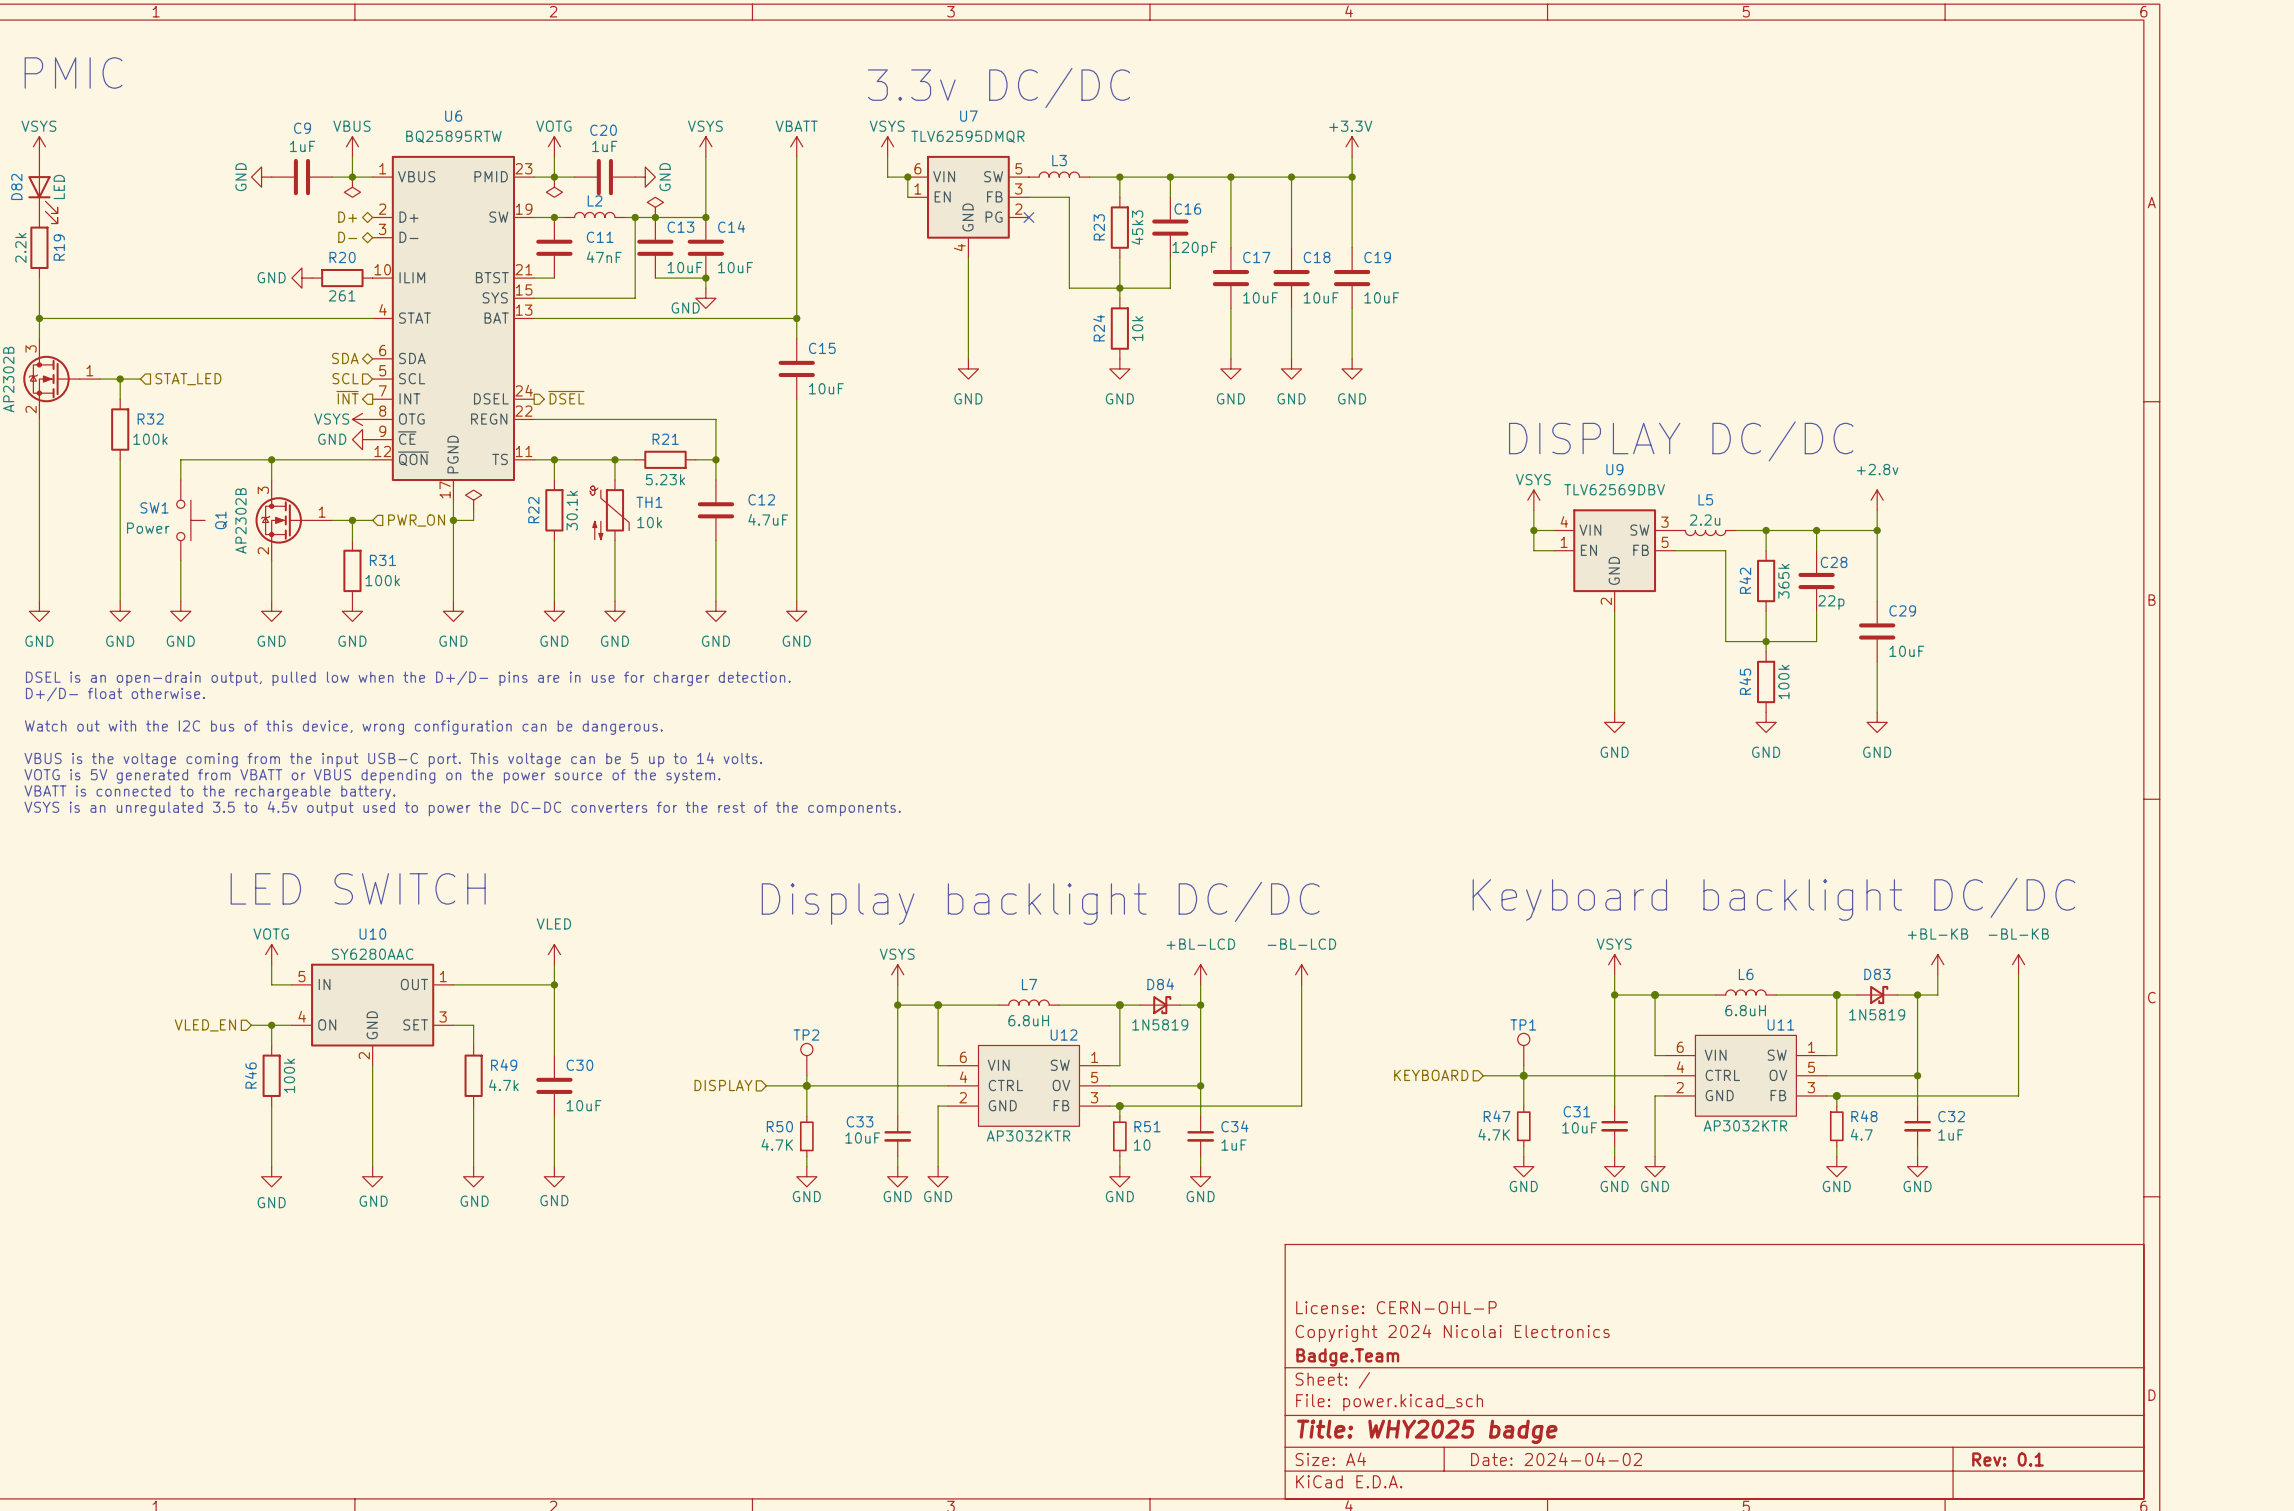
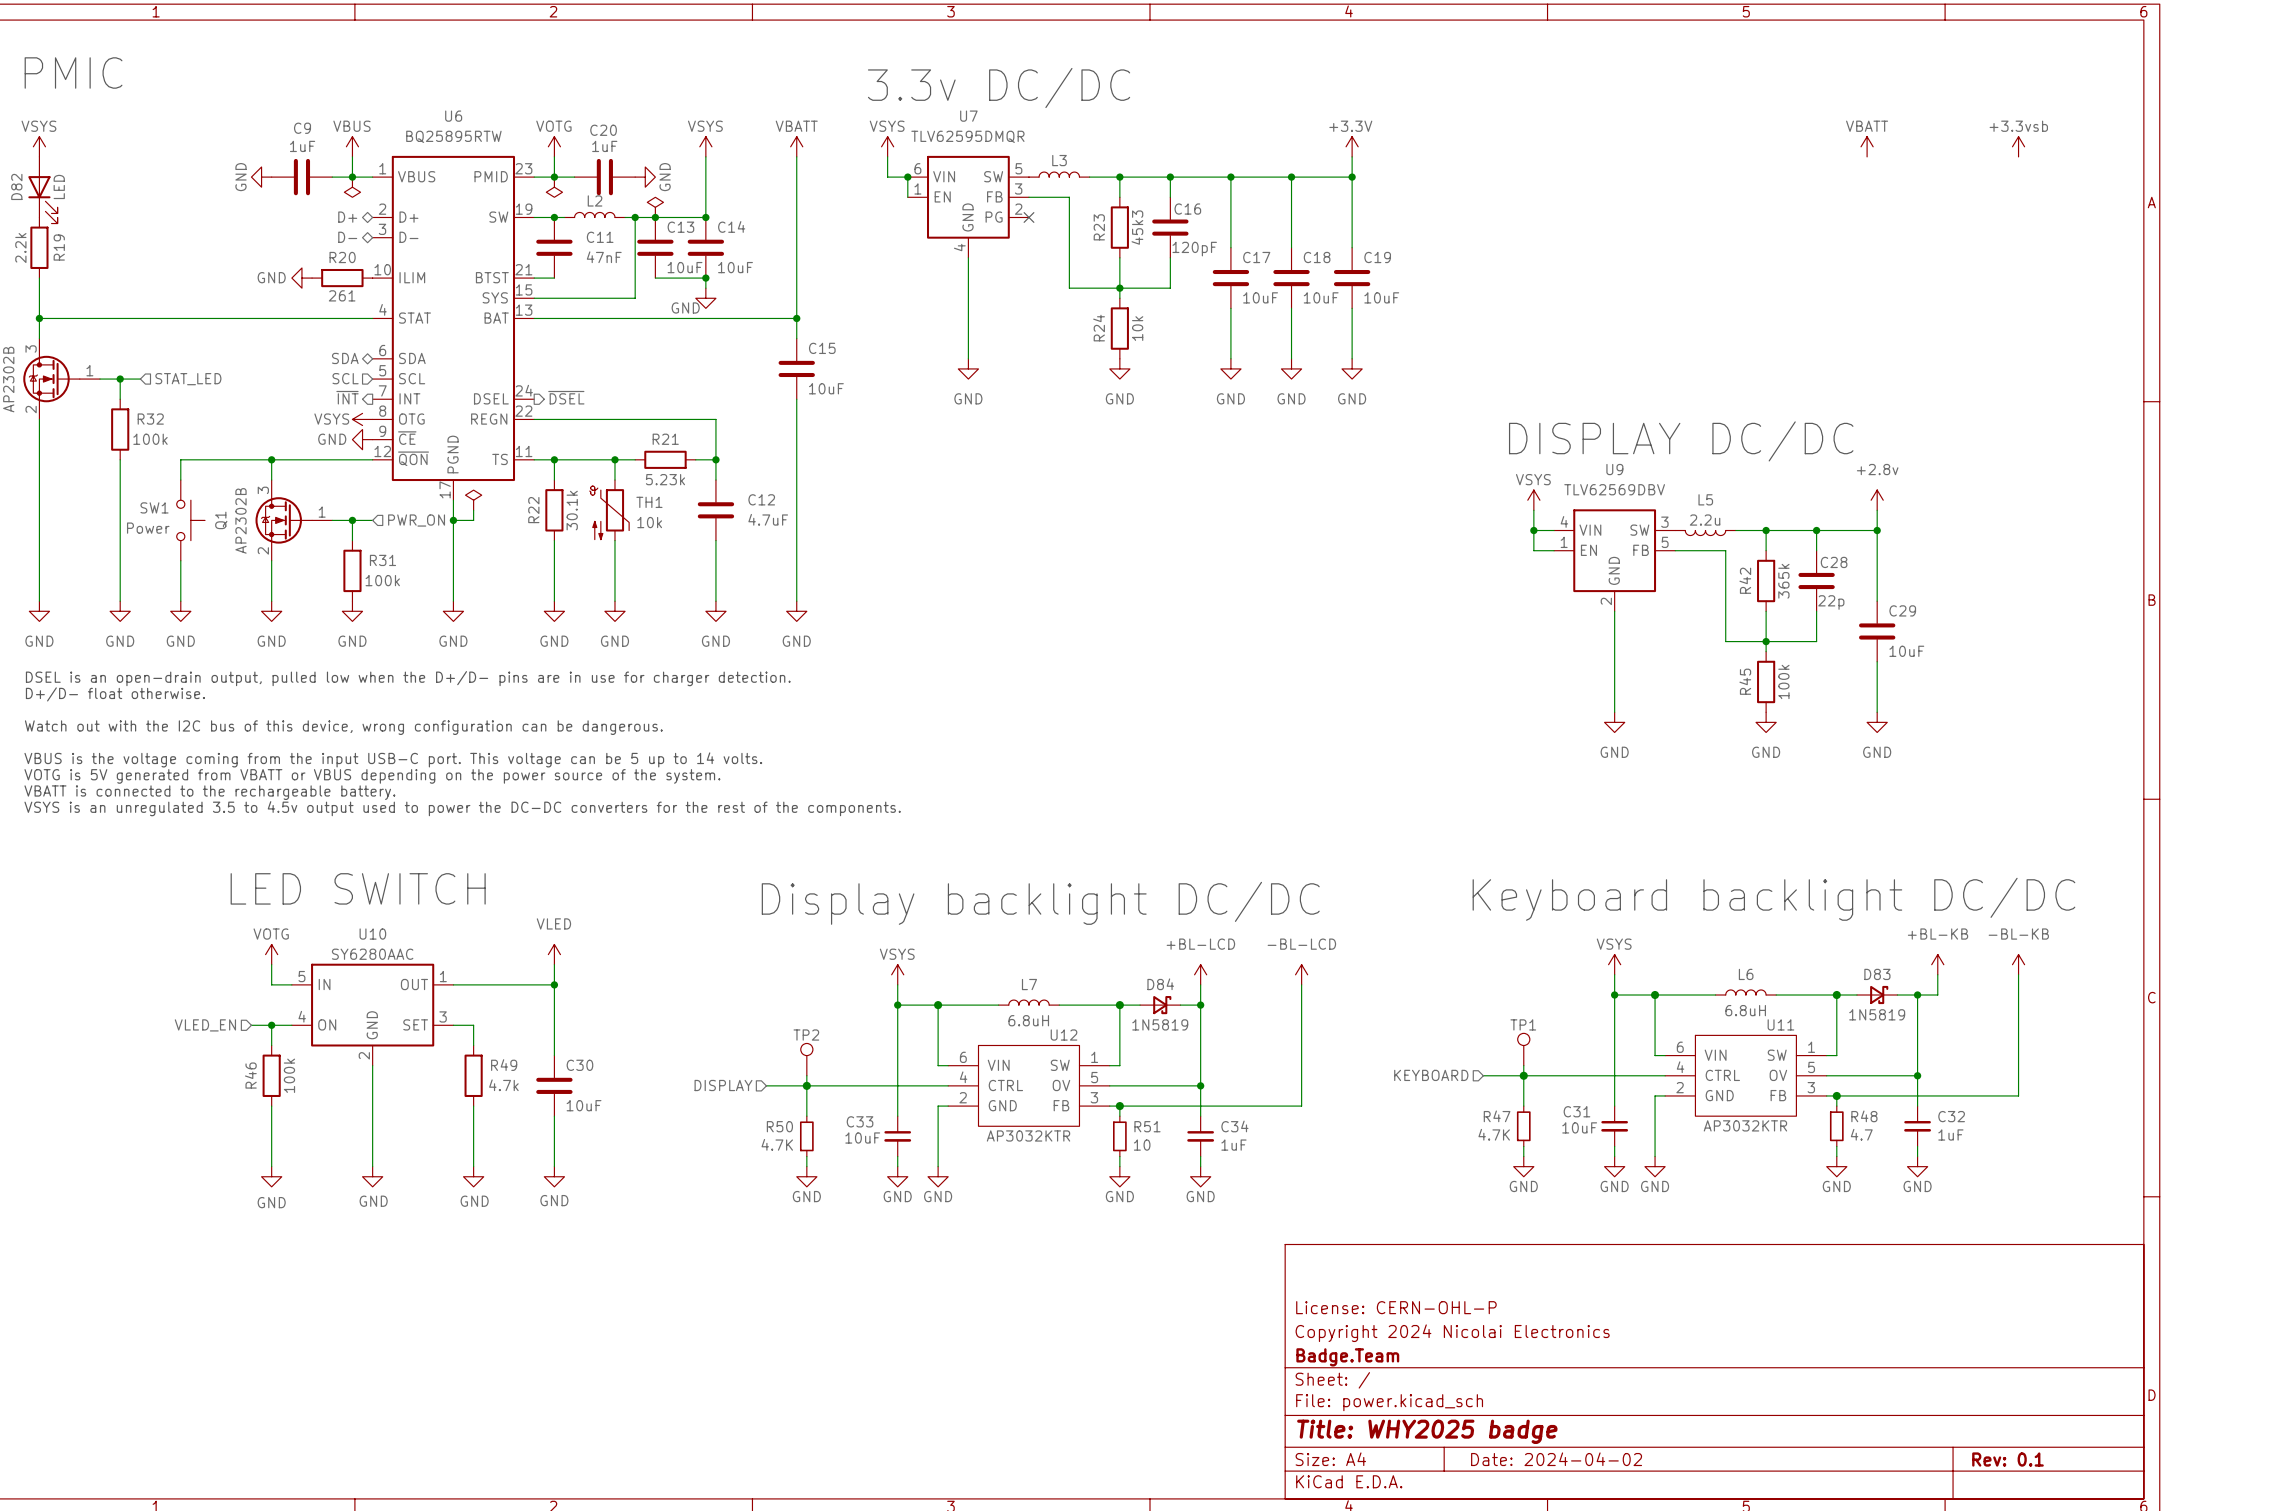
power symbol: none -> VBATT (1867, 146)
power symbol: none -> +3.3vsb (2018, 146)

